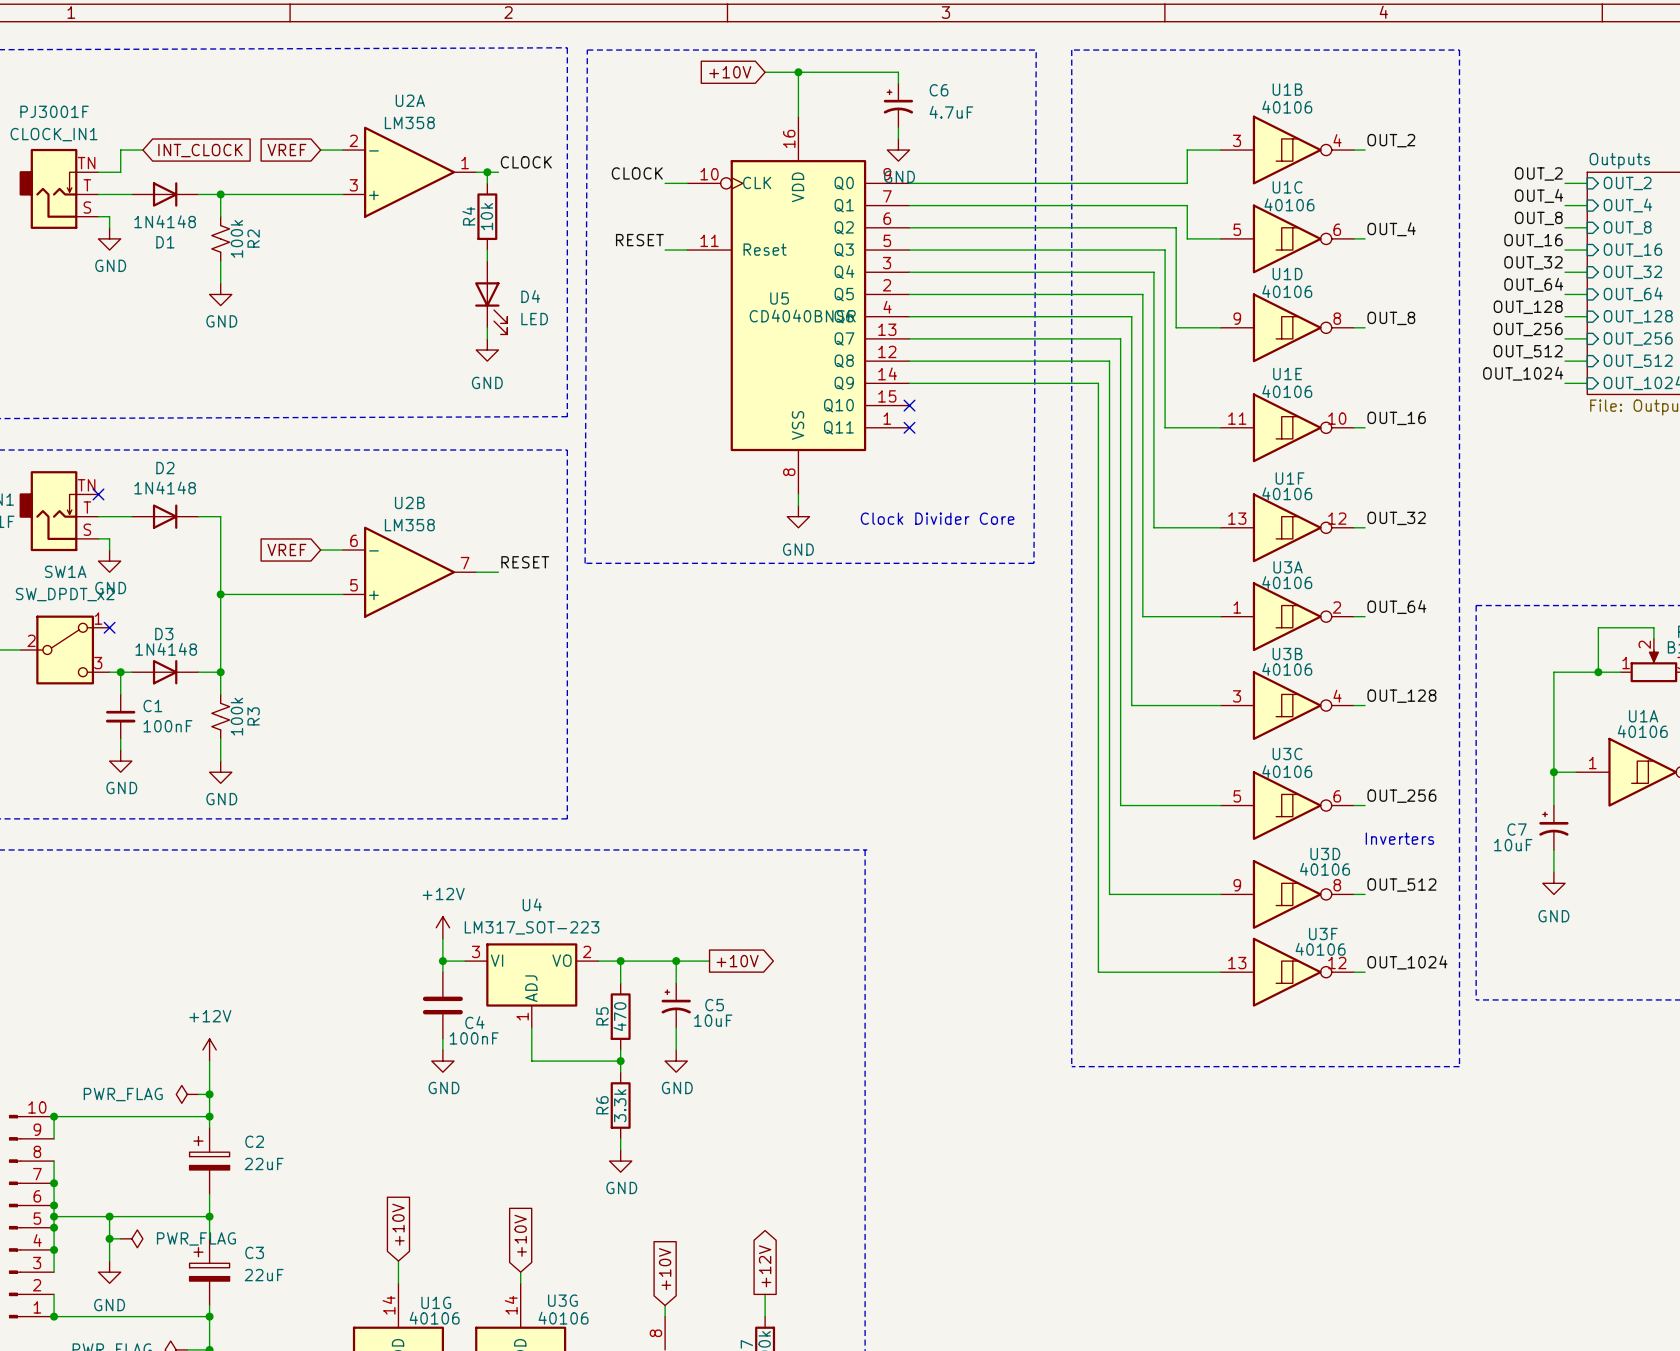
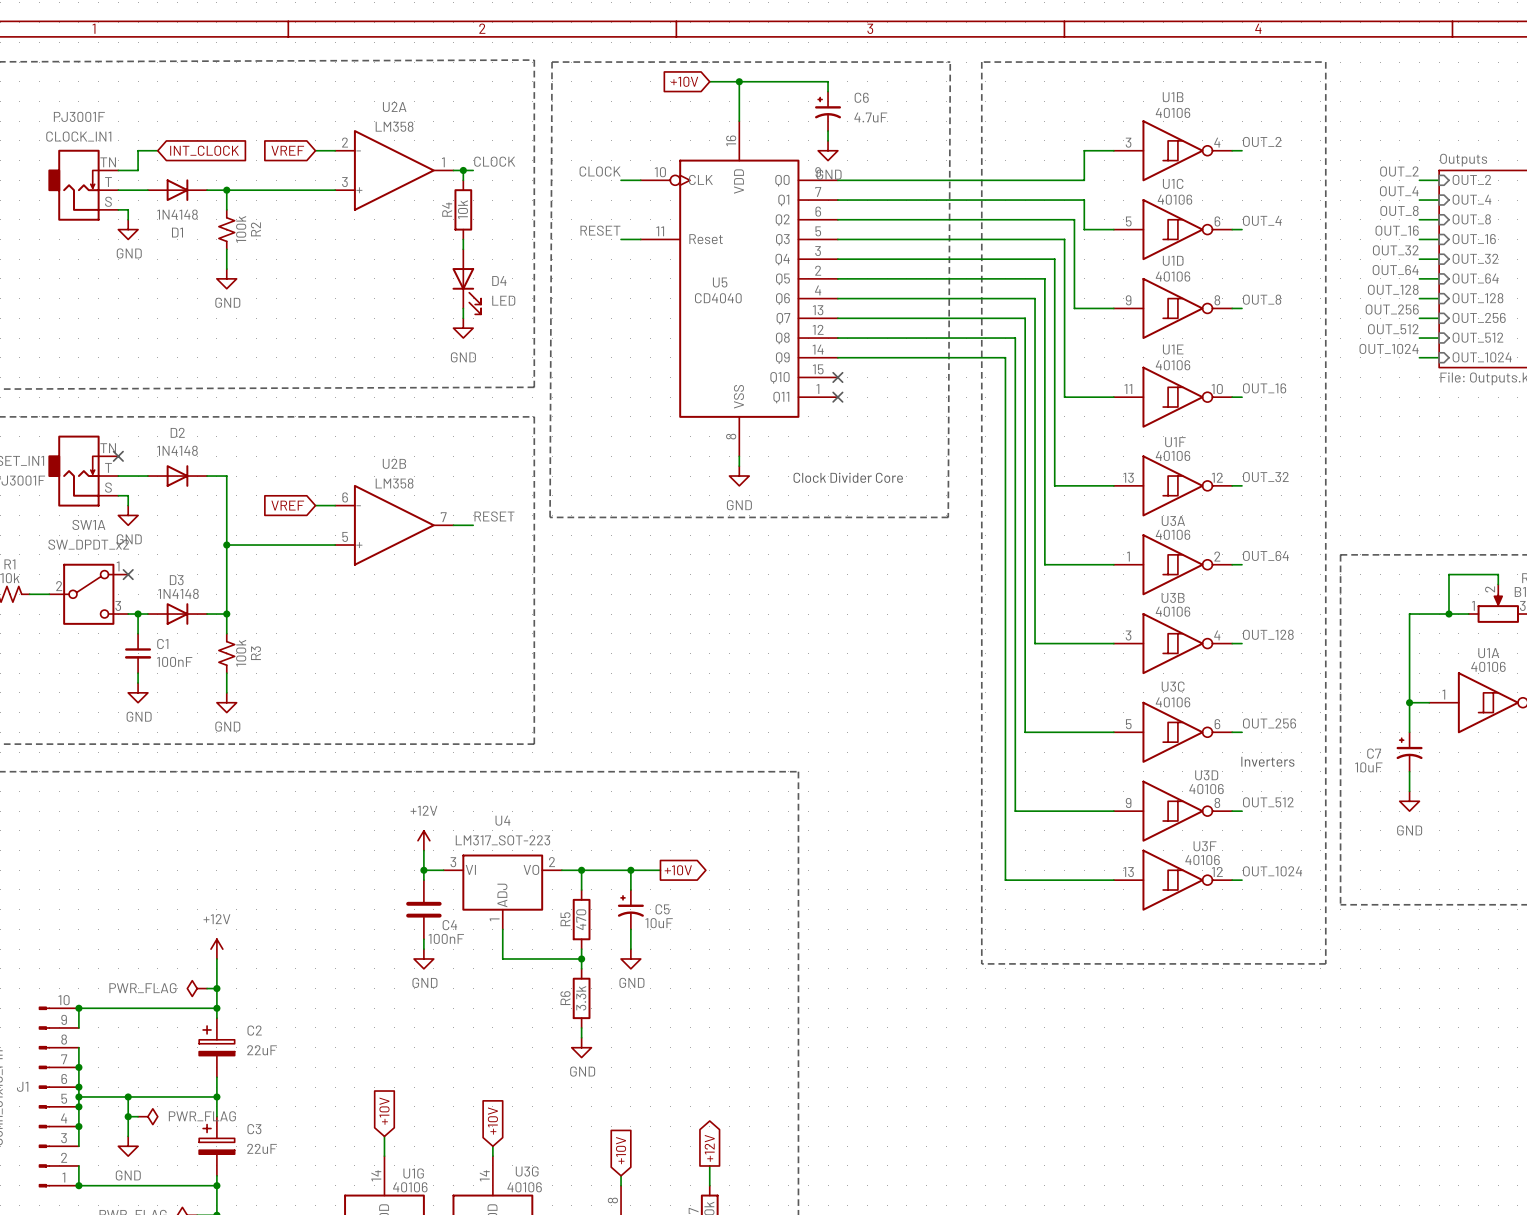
U5 value: CD4040BNSR (802, 316) -> CD4040 (718, 298)

